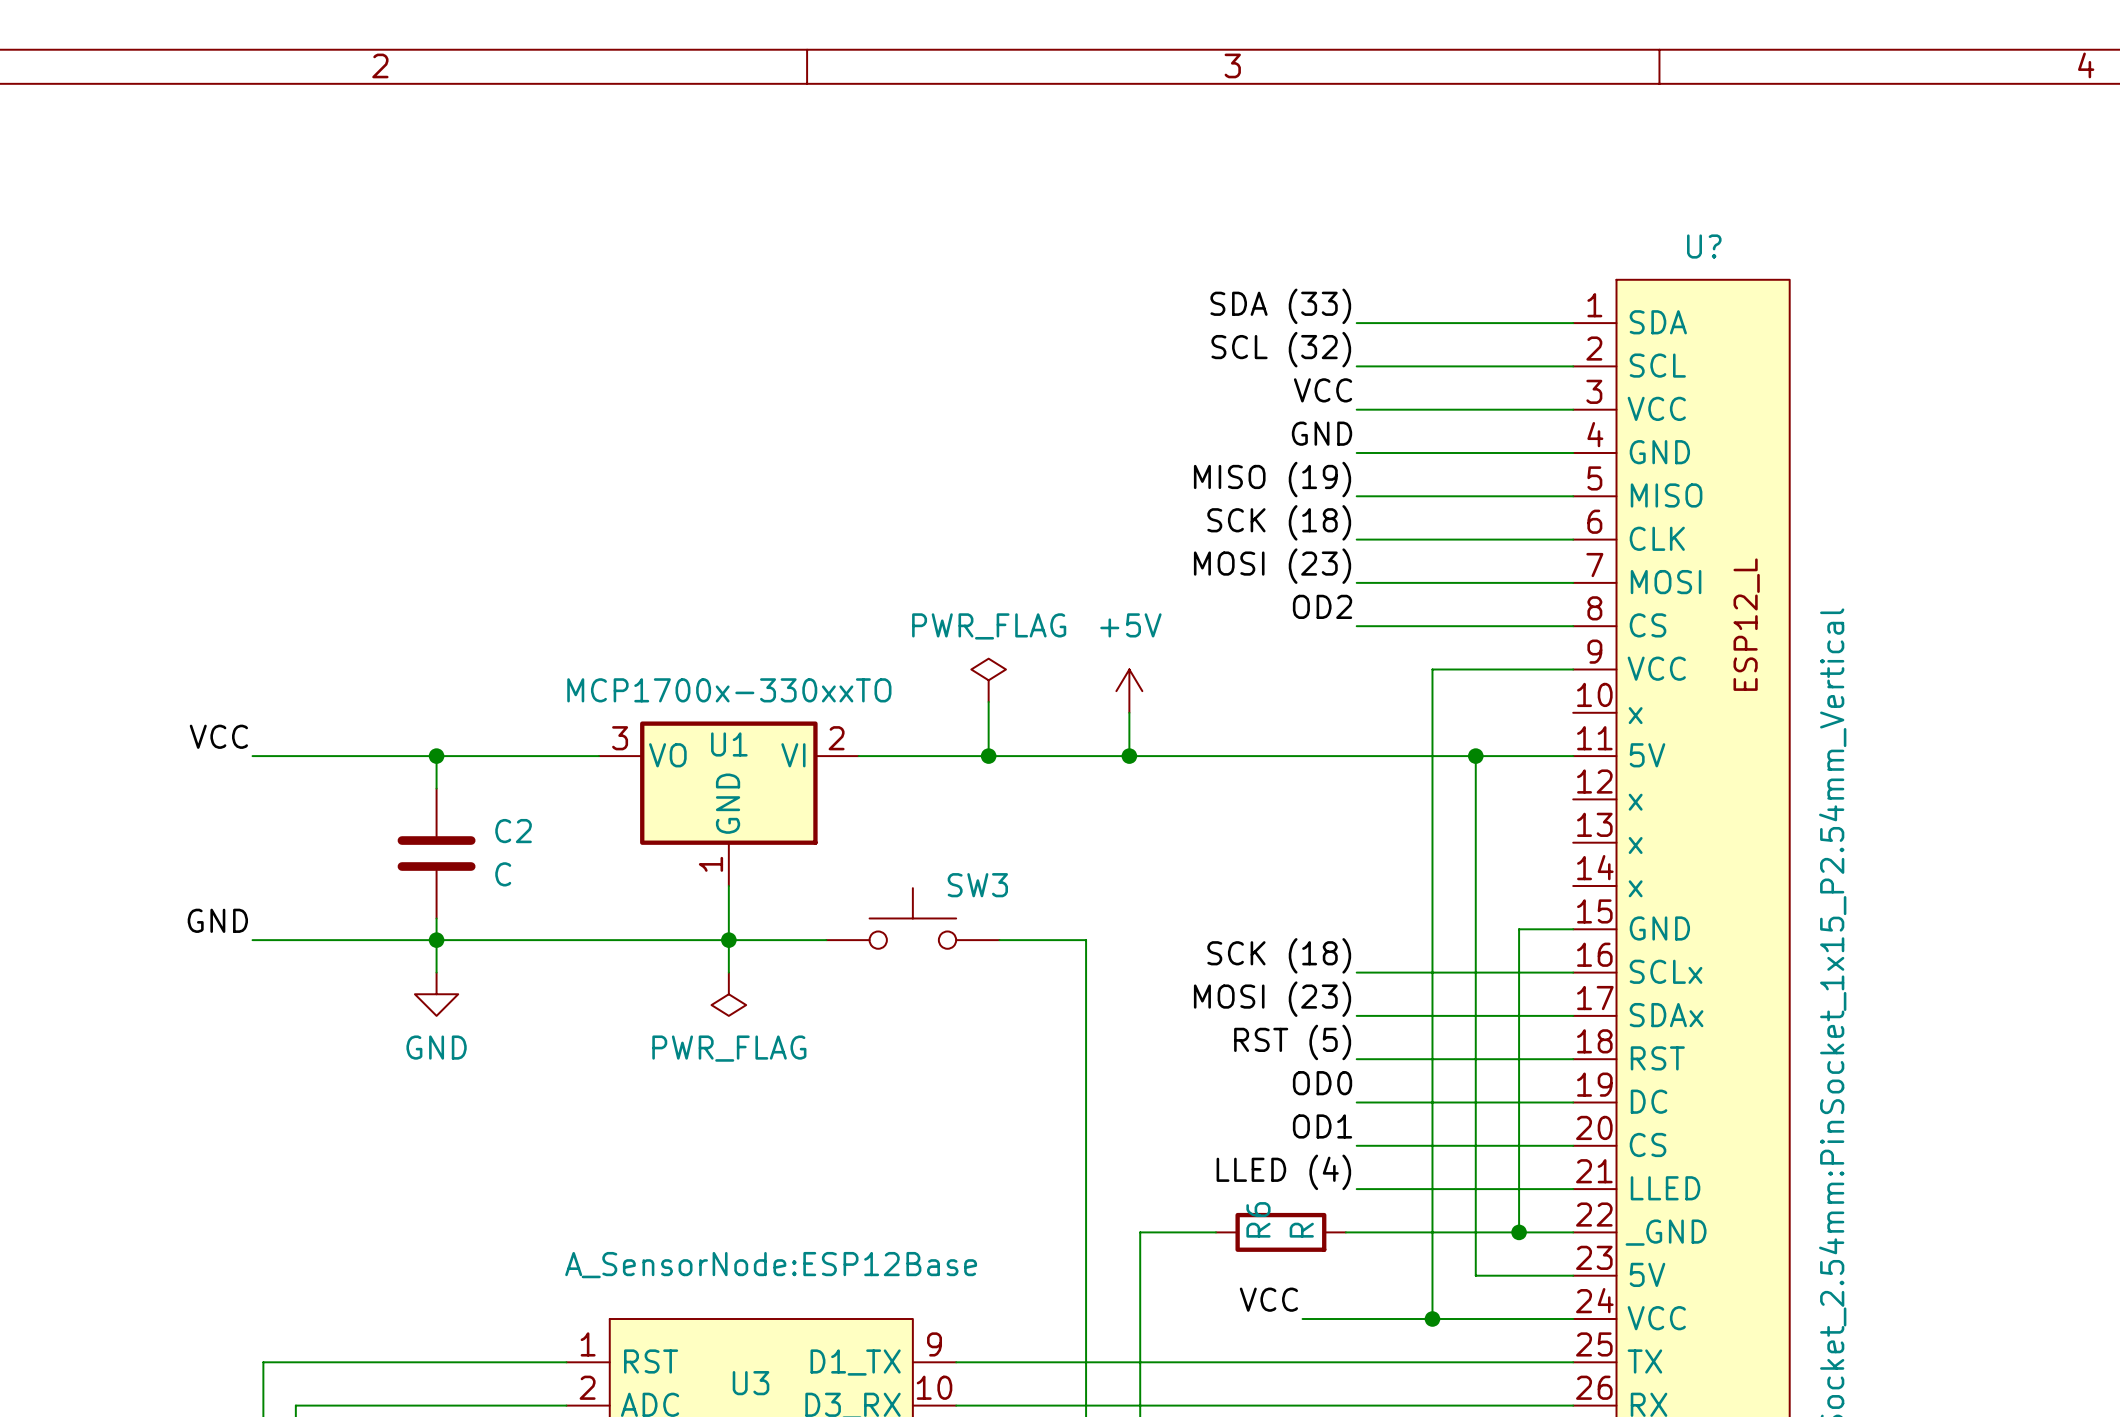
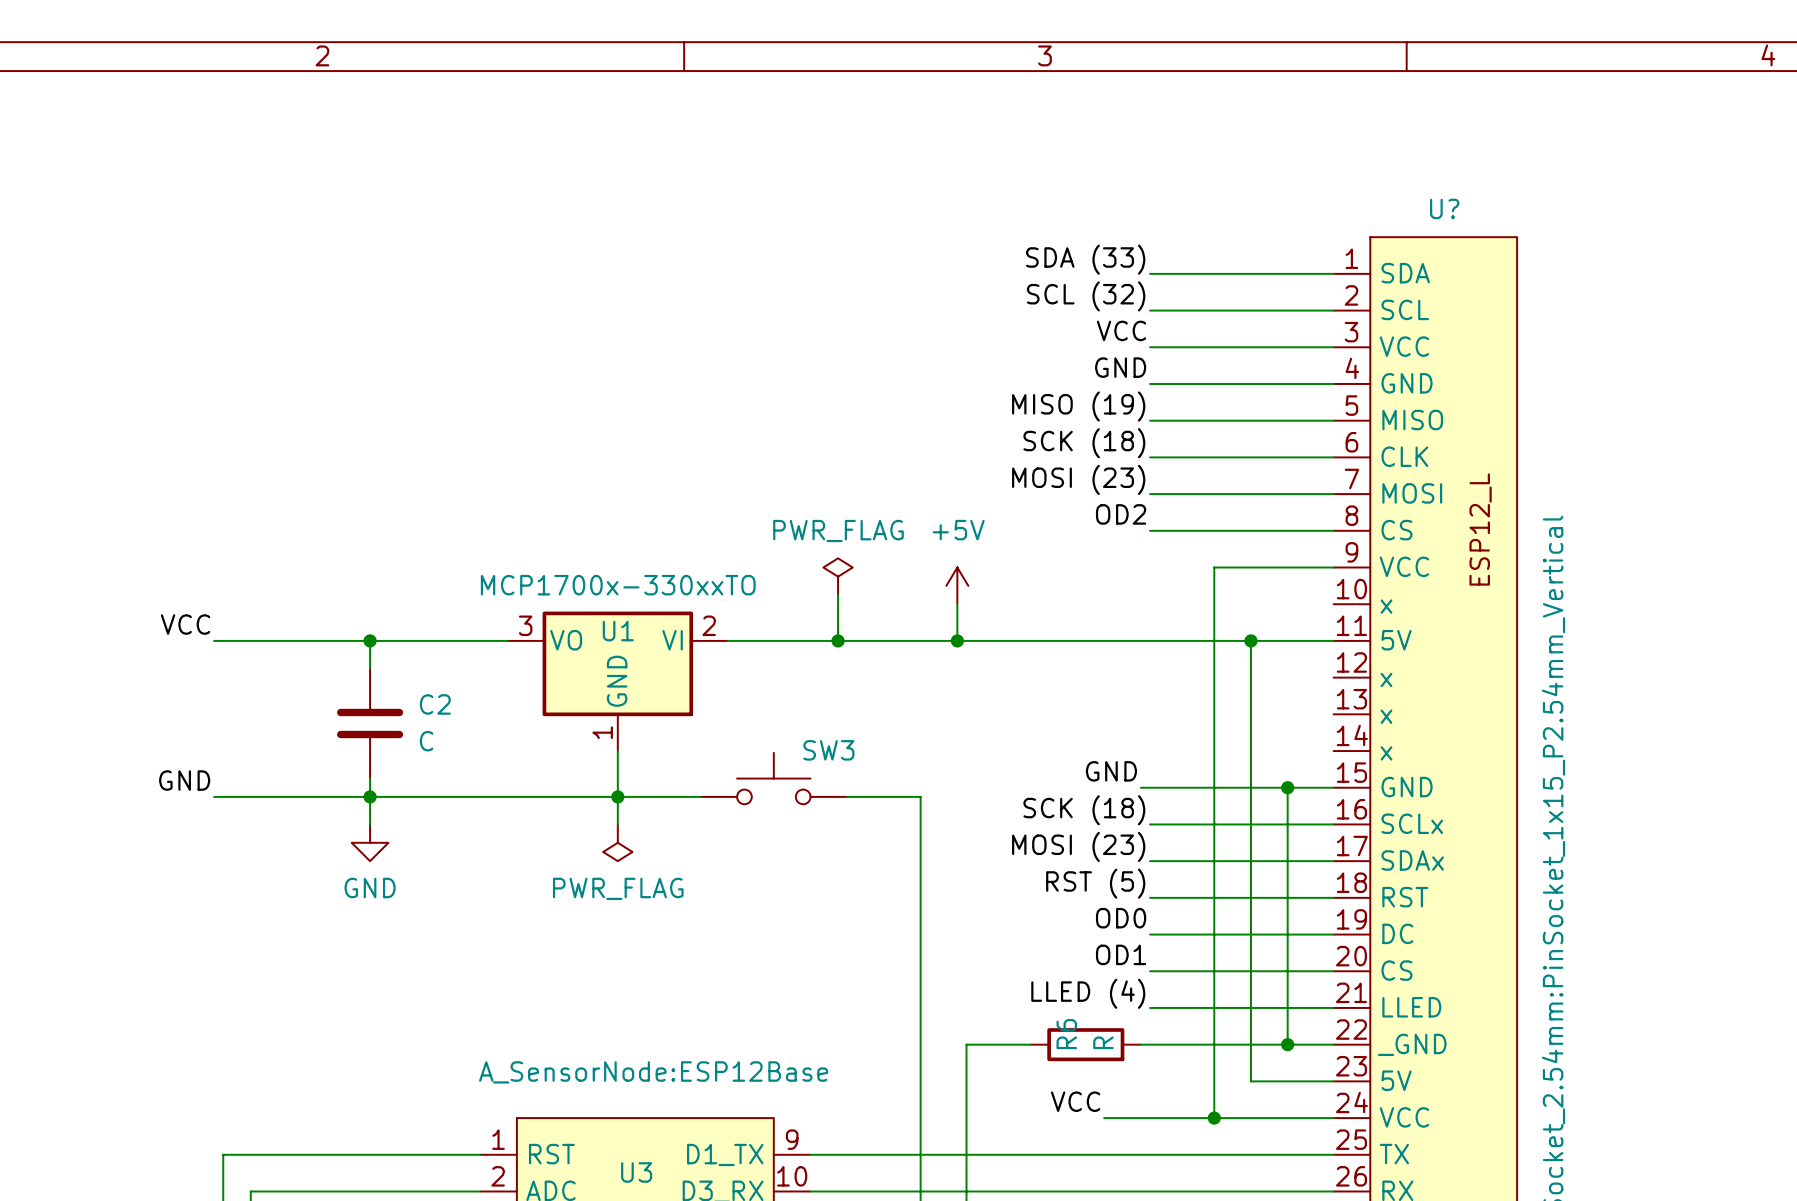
label: none -> GND (1111, 771)
wire: none -> (1140, 787) (1287, 787)
junction: none -> (1287, 787)

